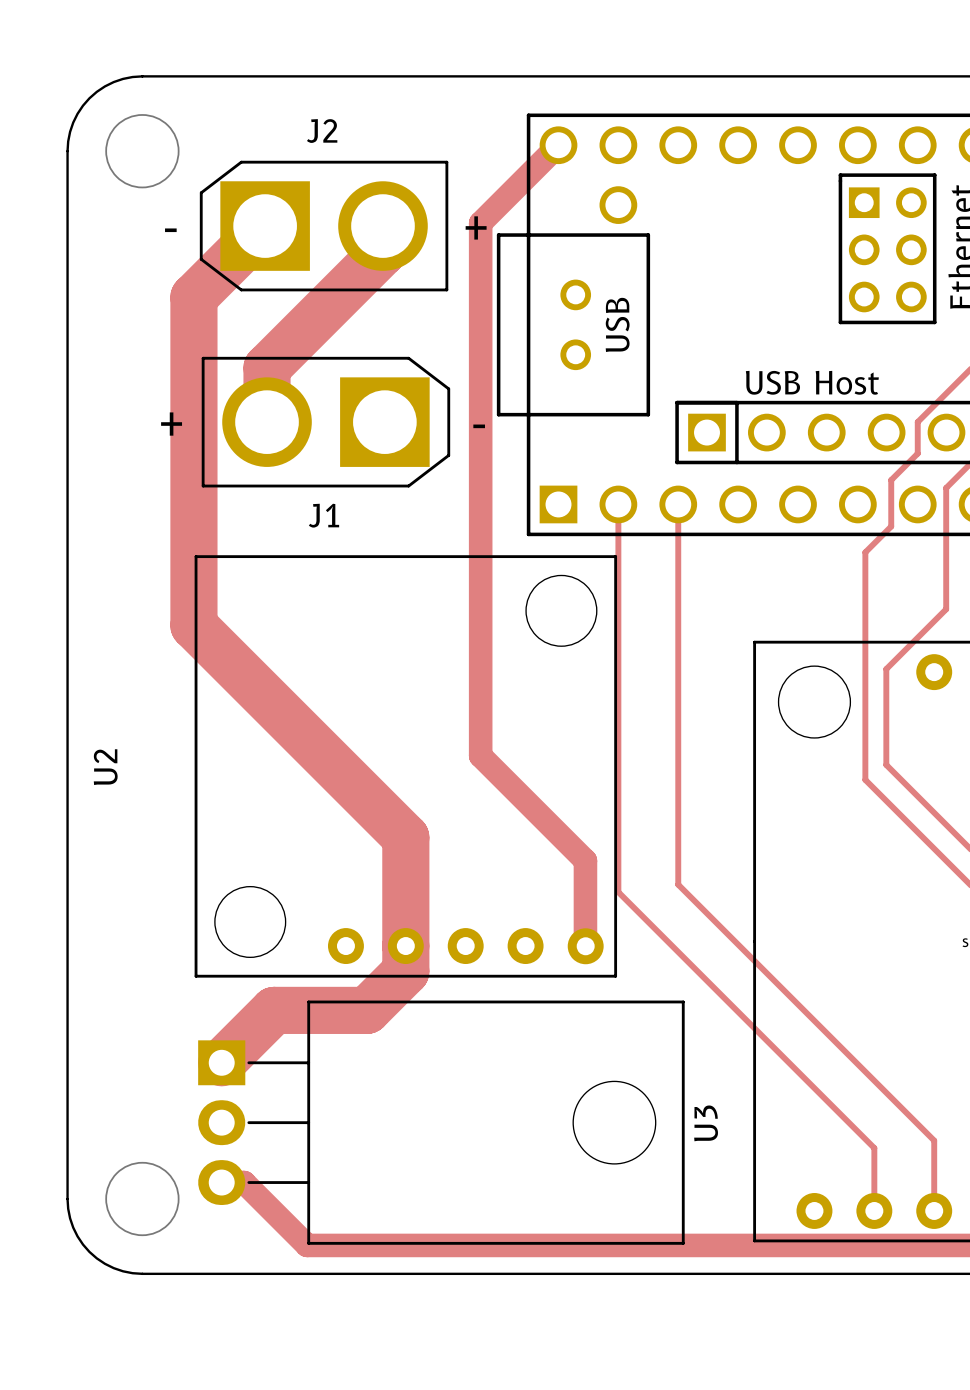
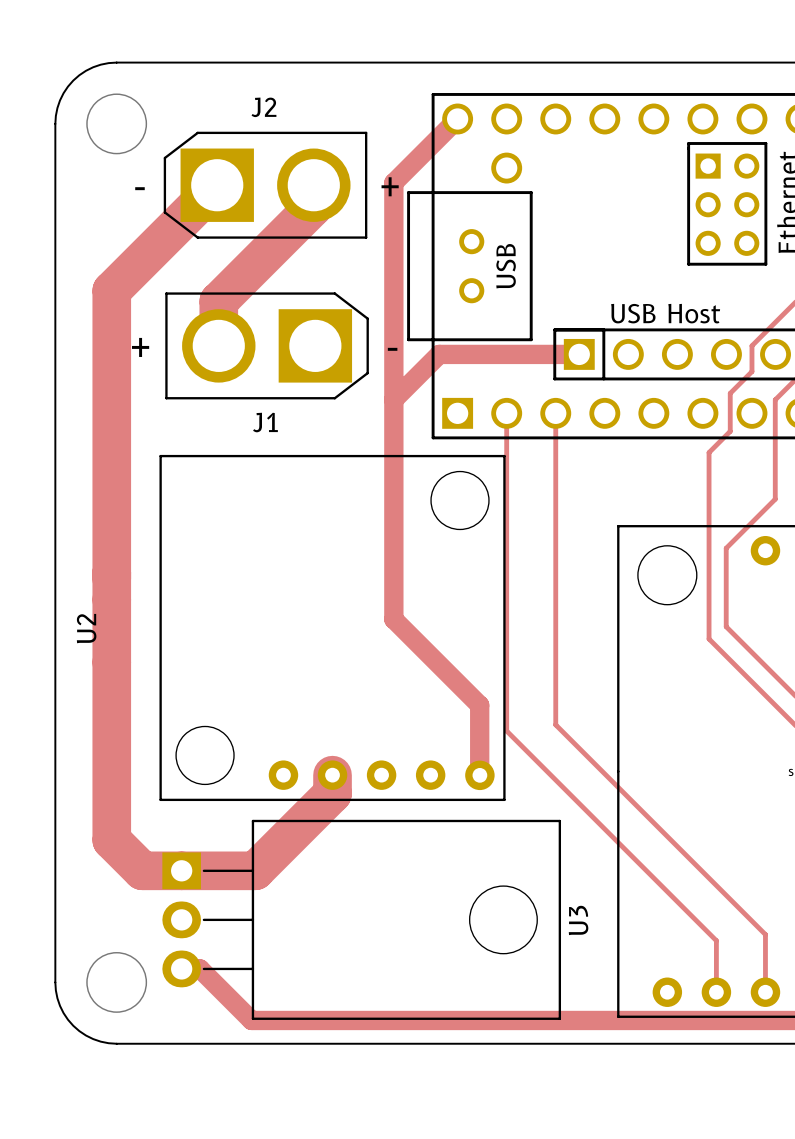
track: (193, 297) (193, 625) (405, 837) (405, 946) -> (158, 243) (111, 290) (111, 840) (142, 870) (255, 870) (332, 793)
track: none -> (579, 354) (439, 354) (393, 399)
track: (405, 968) (405, 971) (366, 1010) (274, 1010) (221, 1062) -> none

